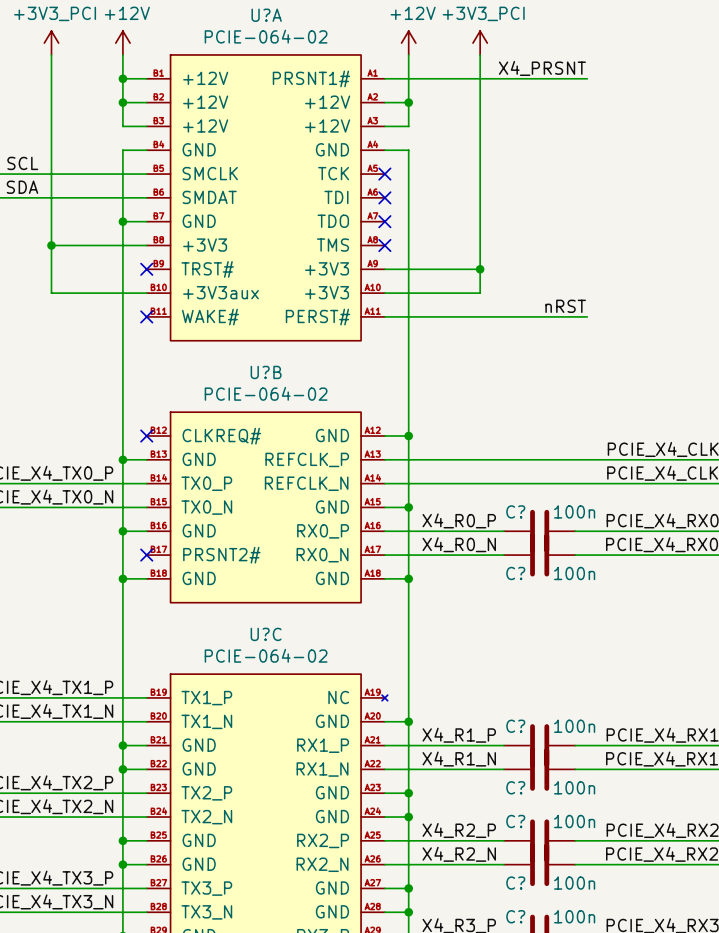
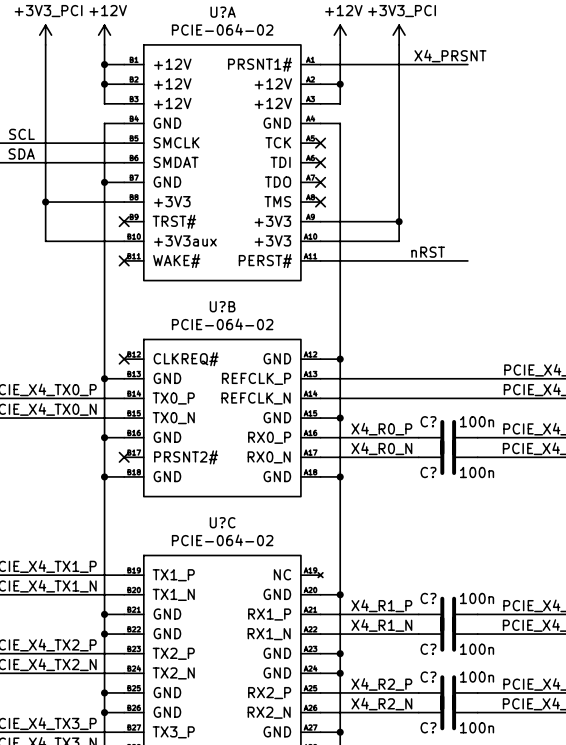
wire: (563, 78) (587, 78) -> none
label position: nRST (565, 306) -> nRST (428, 252)
wire: (563, 316) (587, 316) -> none

